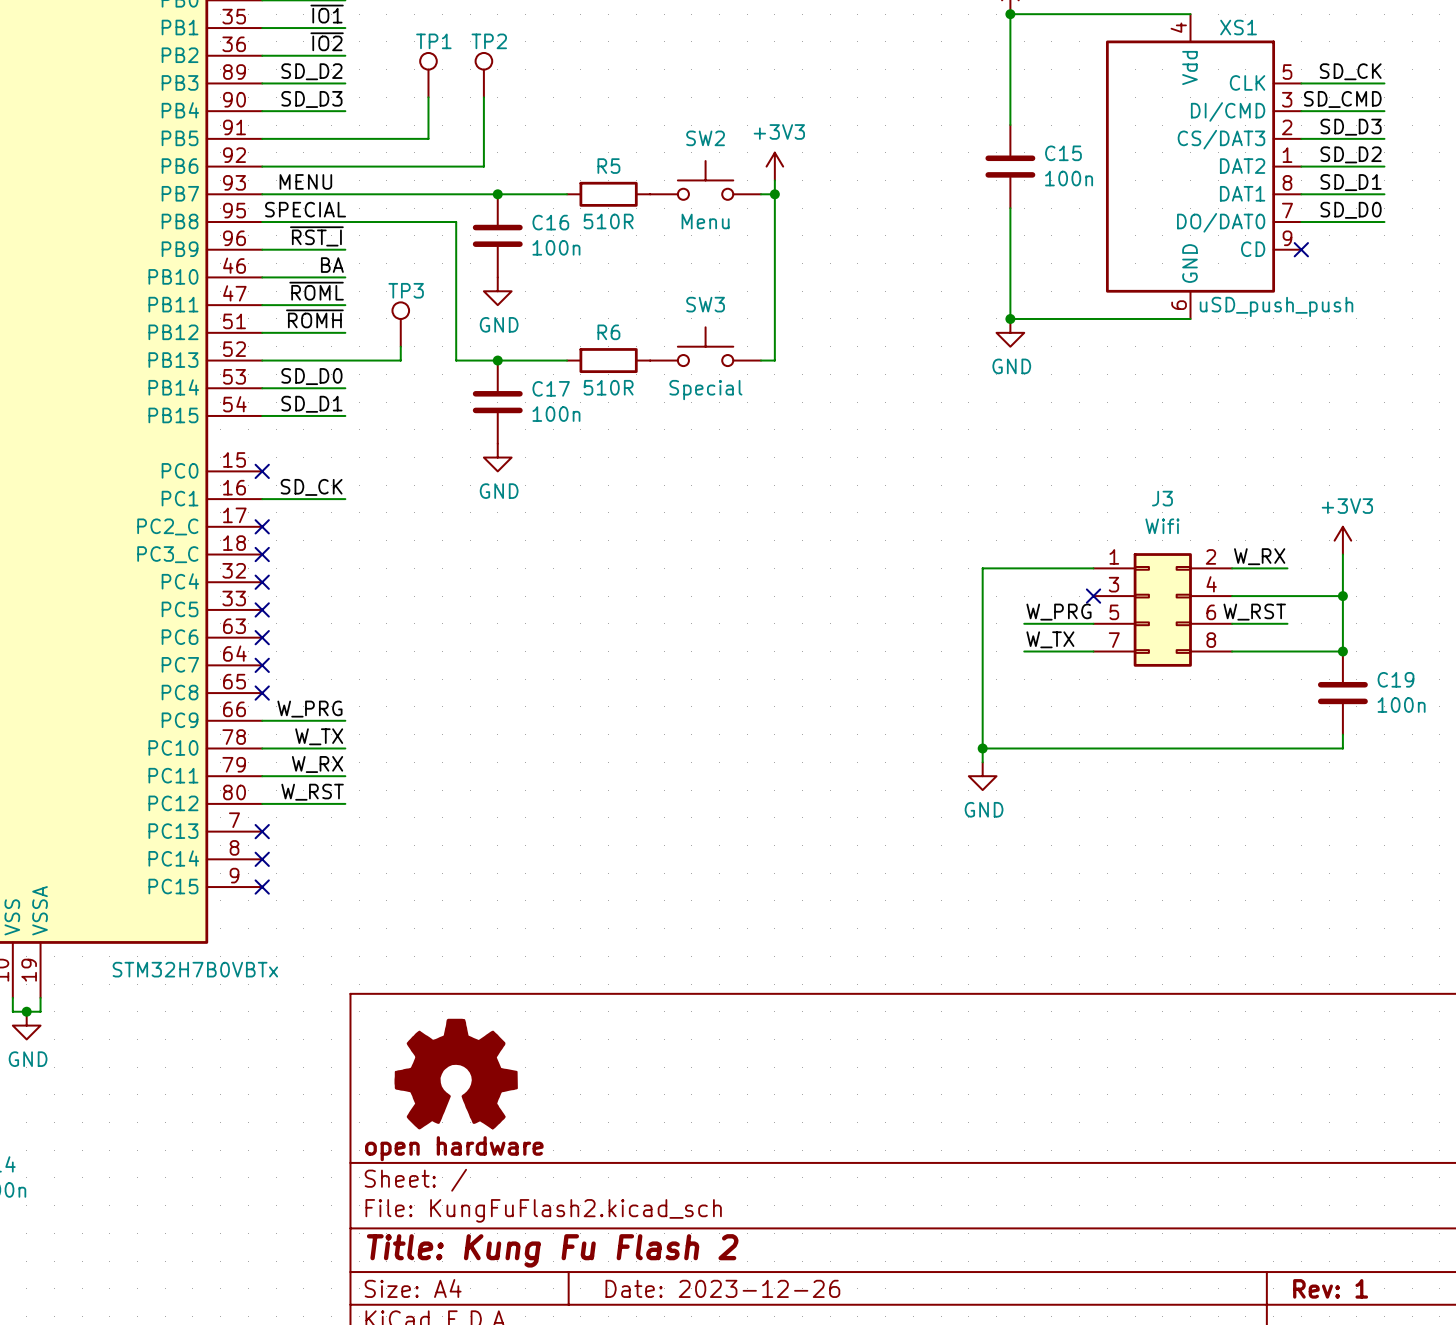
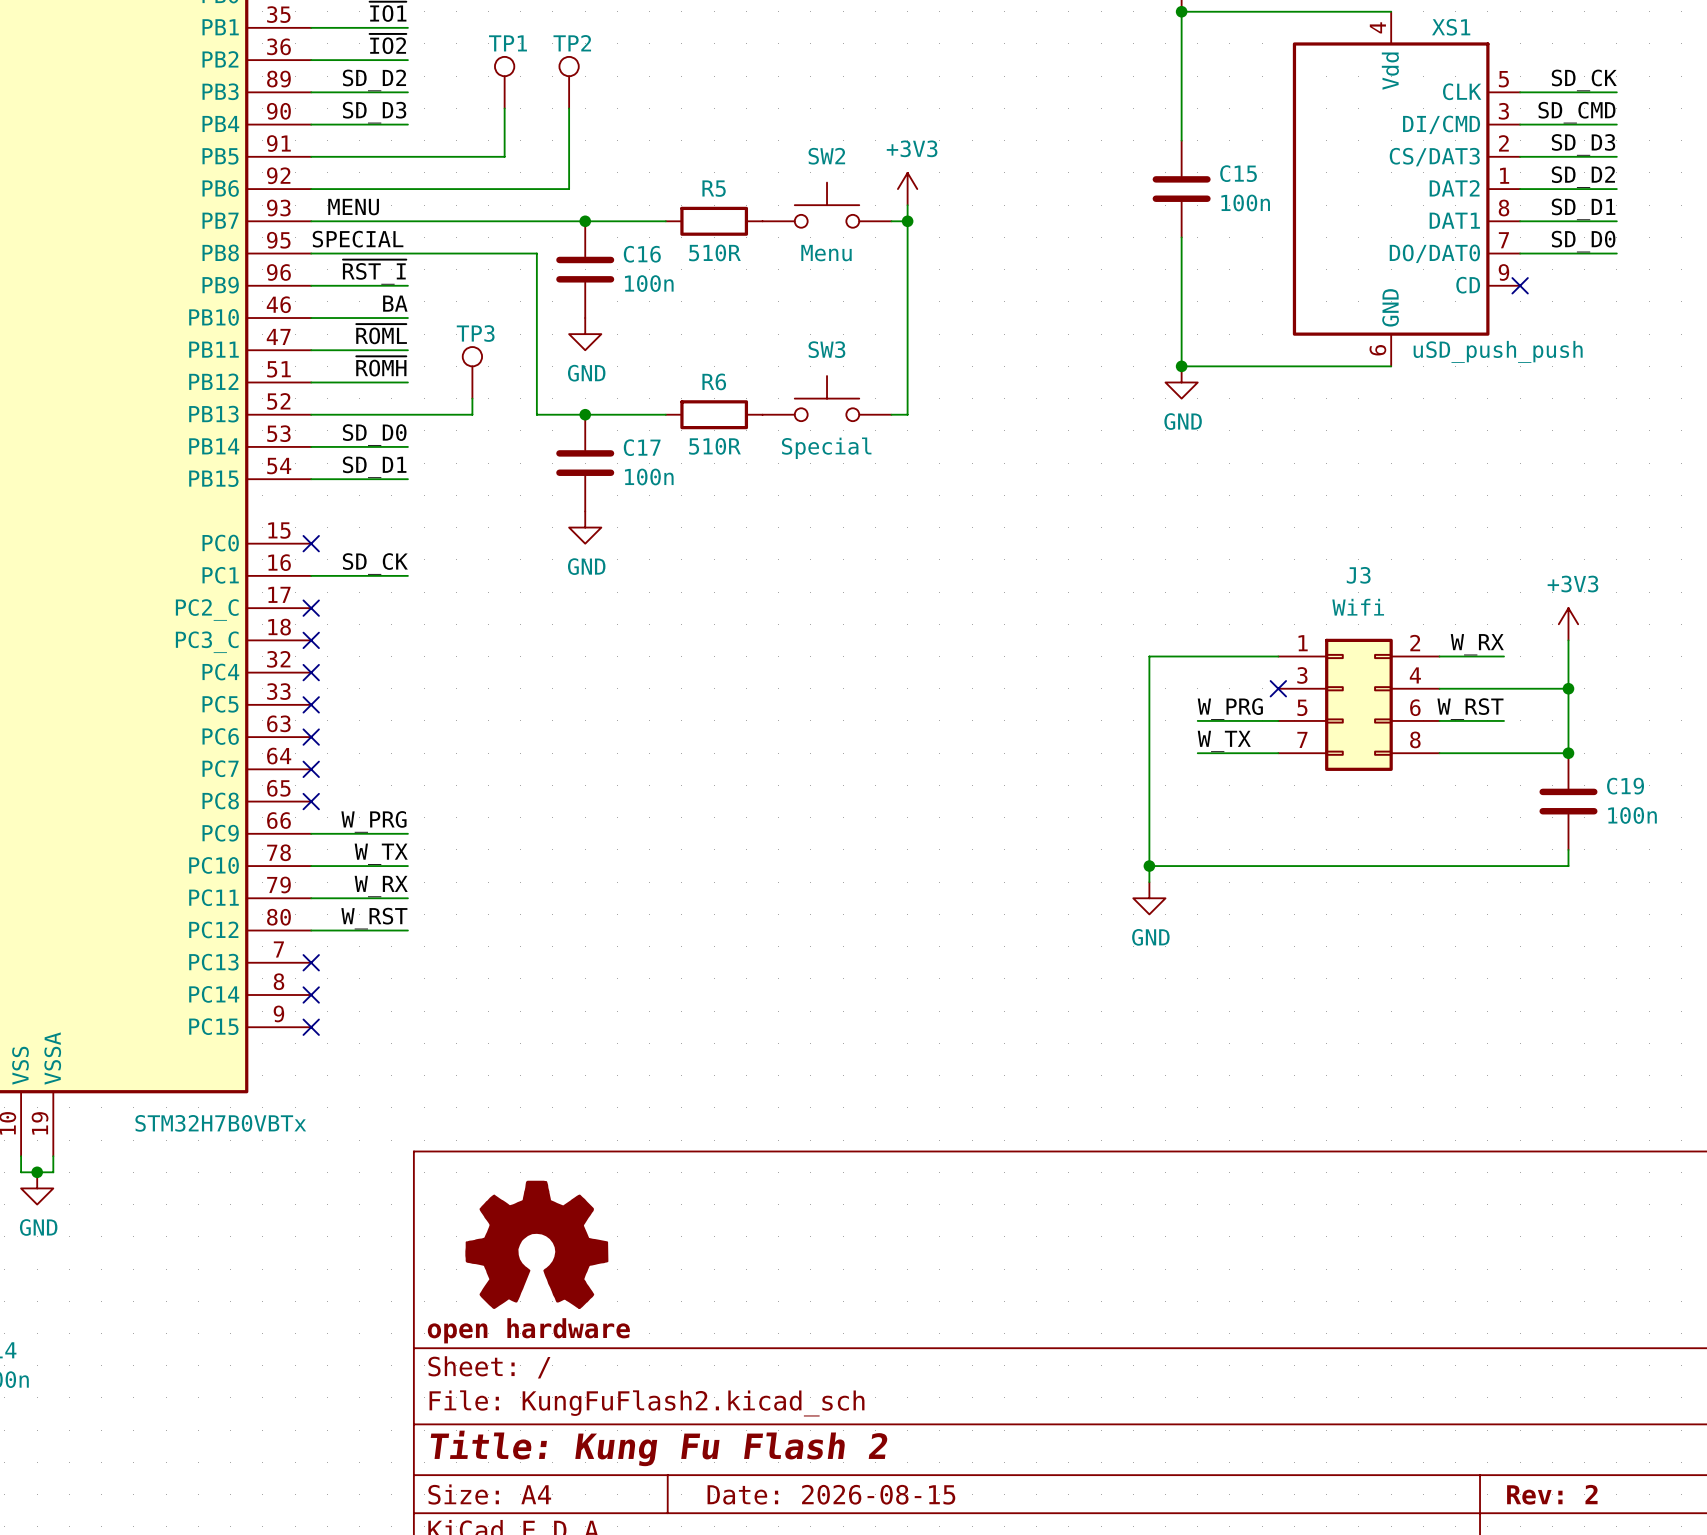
title block: Date: 2023-12-26 (722, 1288) -> Date: 2026-08-15 (831, 1494)
title block: Rev: 1 (1330, 1288) -> Rev: 2 (1552, 1494)

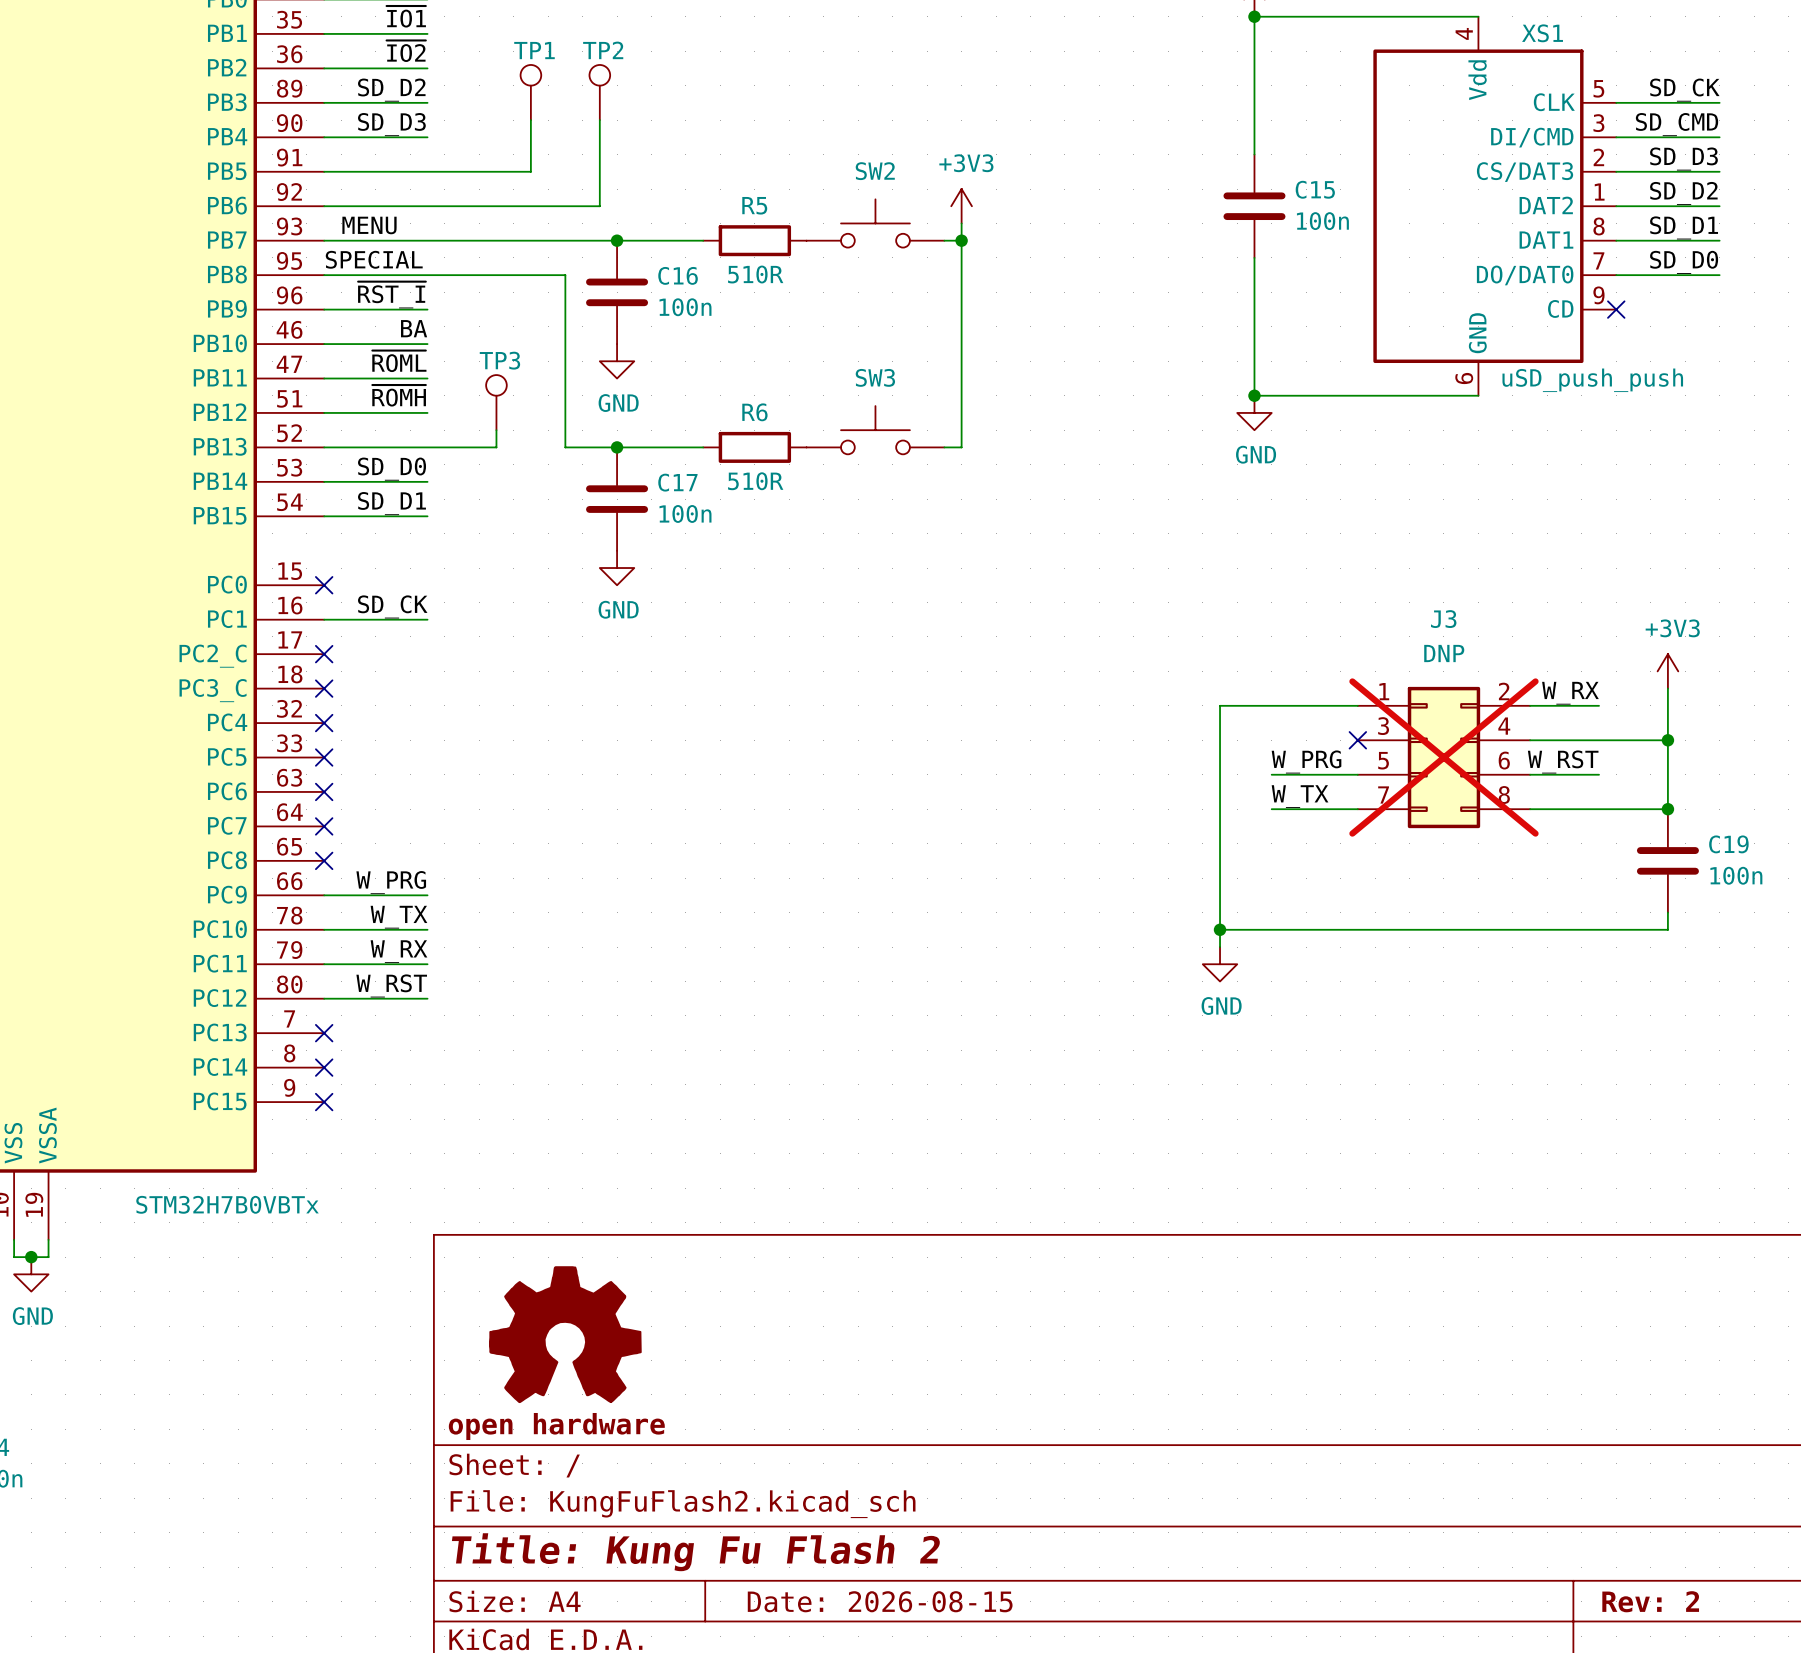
SW2 value: Menu (826, 253) -> none
SW3 value: Special (826, 448) -> none
J3 value: Wifi (1358, 607) -> DNP (1444, 653)
J3 do-not-place cross: none -> (1443, 757)

